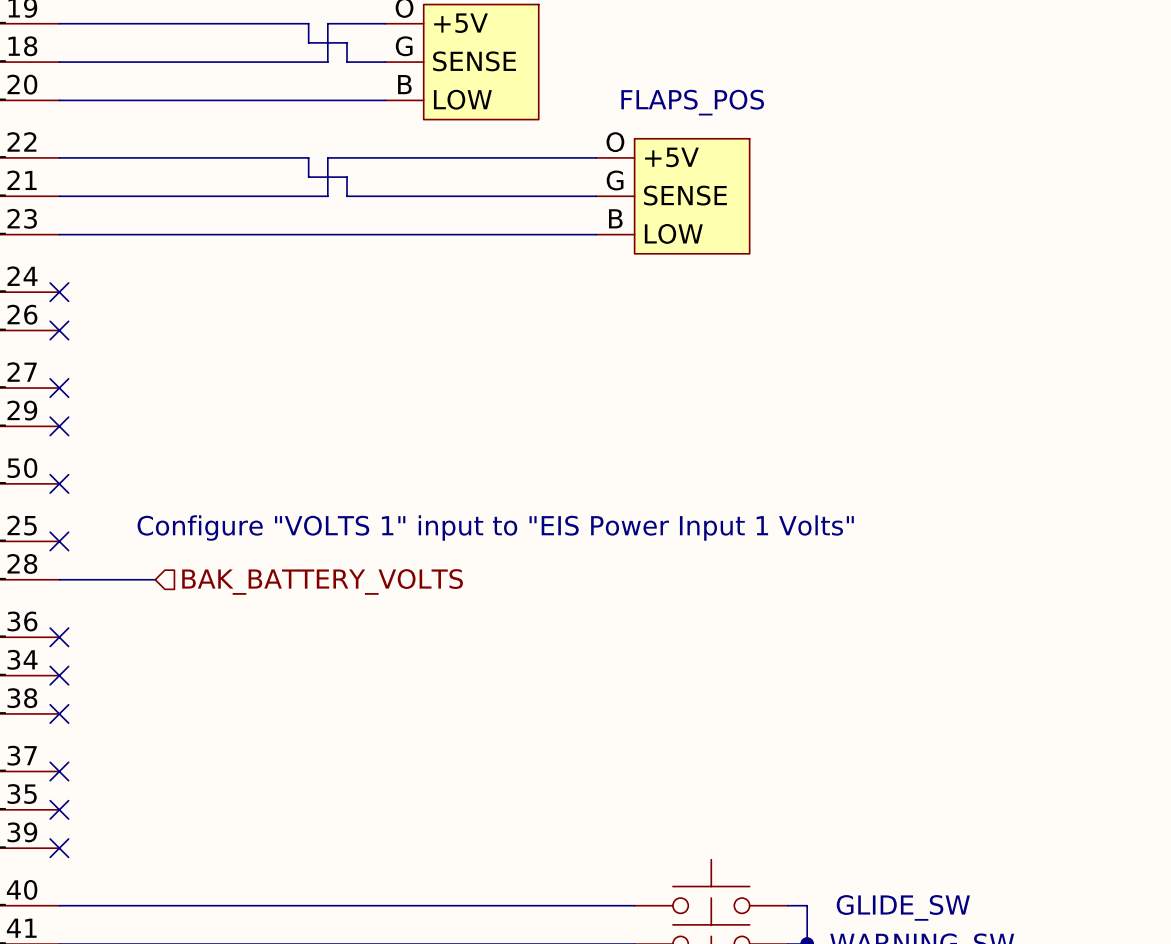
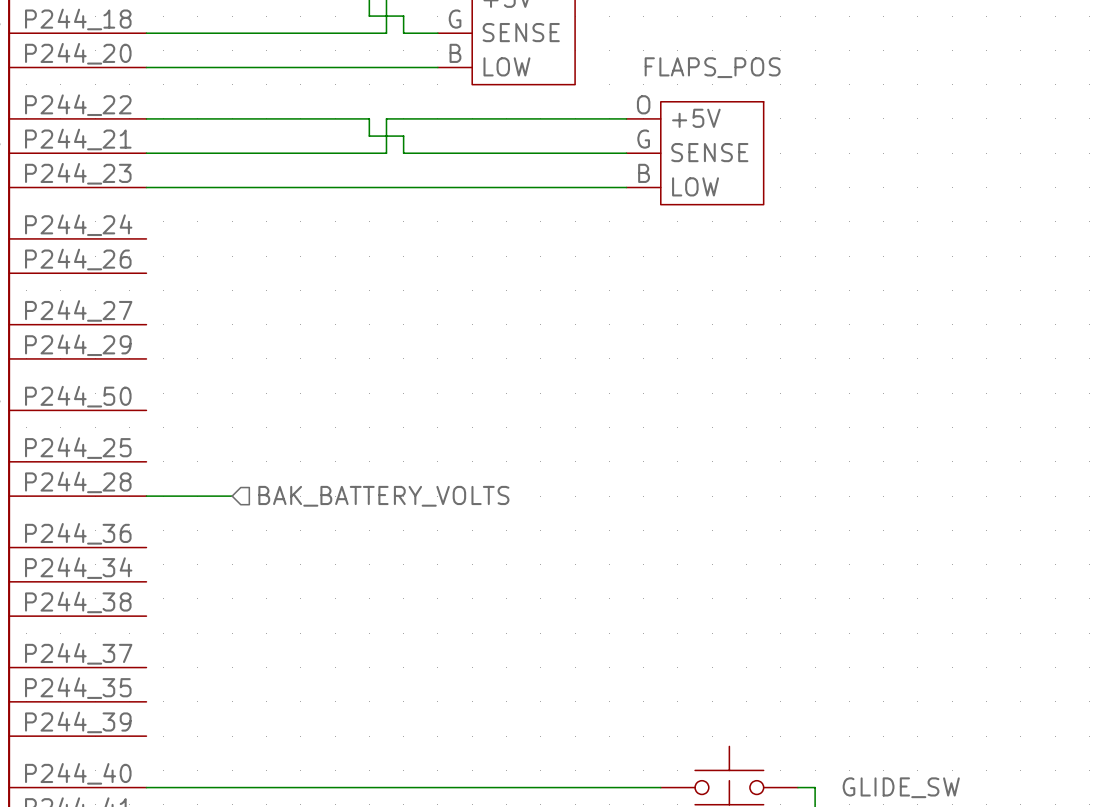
no-connect mark: (59, 292) -> none
no-connect mark: (59, 330) -> none
no-connect mark: (59, 388) -> none
no-connect mark: (59, 426) -> none
no-connect mark: (59, 483) -> none
text: Configure "VOLTS 1" input to "EIS Power Input 1 Volts" (495, 528) -> none
no-connect mark: (59, 541) -> none
no-connect mark: (59, 637) -> none
no-connect mark: (59, 675) -> none
no-connect mark: (59, 713) -> none
no-connect mark: (59, 771) -> none
no-connect mark: (59, 809) -> none
no-connect mark: (59, 848) -> none

